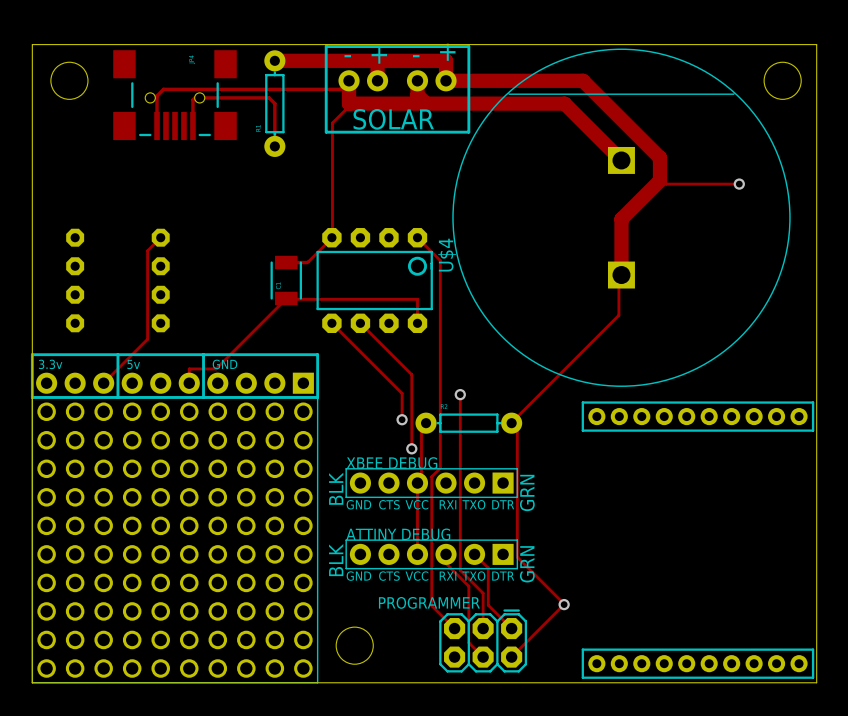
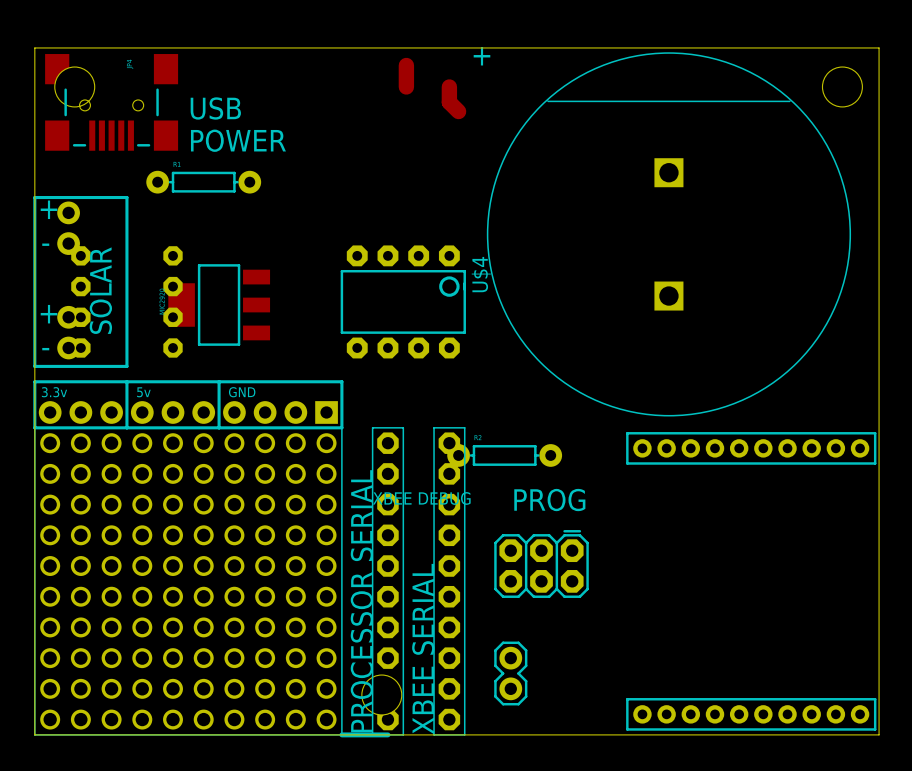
line: (326, 46) (326, 132) (468, 132) (468, 46) (326, 46) -> none
text: + (379, 55) -> none
text: - (347, 56) -> none
text: - (416, 56) -> none
track: (274, 60) (446, 60) (446, 80) (582, 80) (659, 157) (659, 180) -> none
part: (363, 80) -> none
part: (431, 80) -> none
part position: (175, 95) -> (111, 102)
text: none -> USB (215, 108)
part rotation: 0° (274, 103) -> 90° clockwise (203, 182)
part position: (274, 103) -> (203, 182)
track: (349, 103) (564, 103) (621, 160) -> none
track: (349, 103) (349, 80) (340, 89) (163, 89) (157, 95) (157, 126) -> none
track: (349, 103) (332, 123) (331, 238) (307, 262) (286, 262) -> none
text: SOLAR (393, 119) -> none
track: (192, 126) (192, 99) (194, 97) (269, 97) (274, 103) (274, 146) -> none
text: none -> POWER (238, 140)
track: (659, 180) (621, 219) (618, 315) (511, 423) (517, 423) -> none
track: (659, 180) (666, 184) (739, 184) -> none
line: none -> (34, 197) (126, 197) (126, 366) (34, 366) (34, 197)
via: (739, 184) -> none
text: none -> + (49, 209)
part: none -> (68, 228)
text: none -> - (45, 244)
track: (160, 237) (147, 250) (147, 339) (103, 383) -> none
track: (417, 237) (440, 260) (440, 468) (431, 476) (431, 605) (454, 628) -> none
text: none -> SOLAR (100, 290)
part: (286, 280) -> none
part: none -> (219, 305)
text: none -> + (49, 314)
part: none -> (68, 332)
track: (331, 323) (402, 393) (402, 419) -> none
track: (360, 323) (411, 374) (411, 448) -> none
track: (417, 323) (417, 299) (286, 298) (216, 368) (189, 368) (189, 383) -> none
text: none -> - (45, 349)
track: (460, 394) (460, 570) (483, 593) (483, 628) -> none
via: (460, 394) -> none
track: (517, 417) (517, 557) (564, 604) (511, 657) -> none
via: (402, 419) -> none
track: (426, 423) (421, 427) (421, 478) (417, 483) (417, 554) -> none
via: (411, 448) -> none
text: none -> PROG (549, 500)
part: (431, 483) -> none
text: ATTINY DEBUG (398, 534) -> none
part: none -> (387, 581)
part: none -> (449, 581)
part: (431, 554) -> none
track: (446, 554) (446, 563) (468, 586) (468, 642) (483, 657) -> none
track: (474, 554) (488, 568) (488, 605) (511, 628) -> none
text: none -> PROCESSOR SERIAL (361, 601)
text: none -> XBEE SERIAL (423, 649)
text: PROGRAMMER (429, 602) -> none
via: (564, 604) -> none
part: none -> (510, 673)
part position: (483, 640) -> (541, 563)
line: none -> (341, 734) (387, 734)

